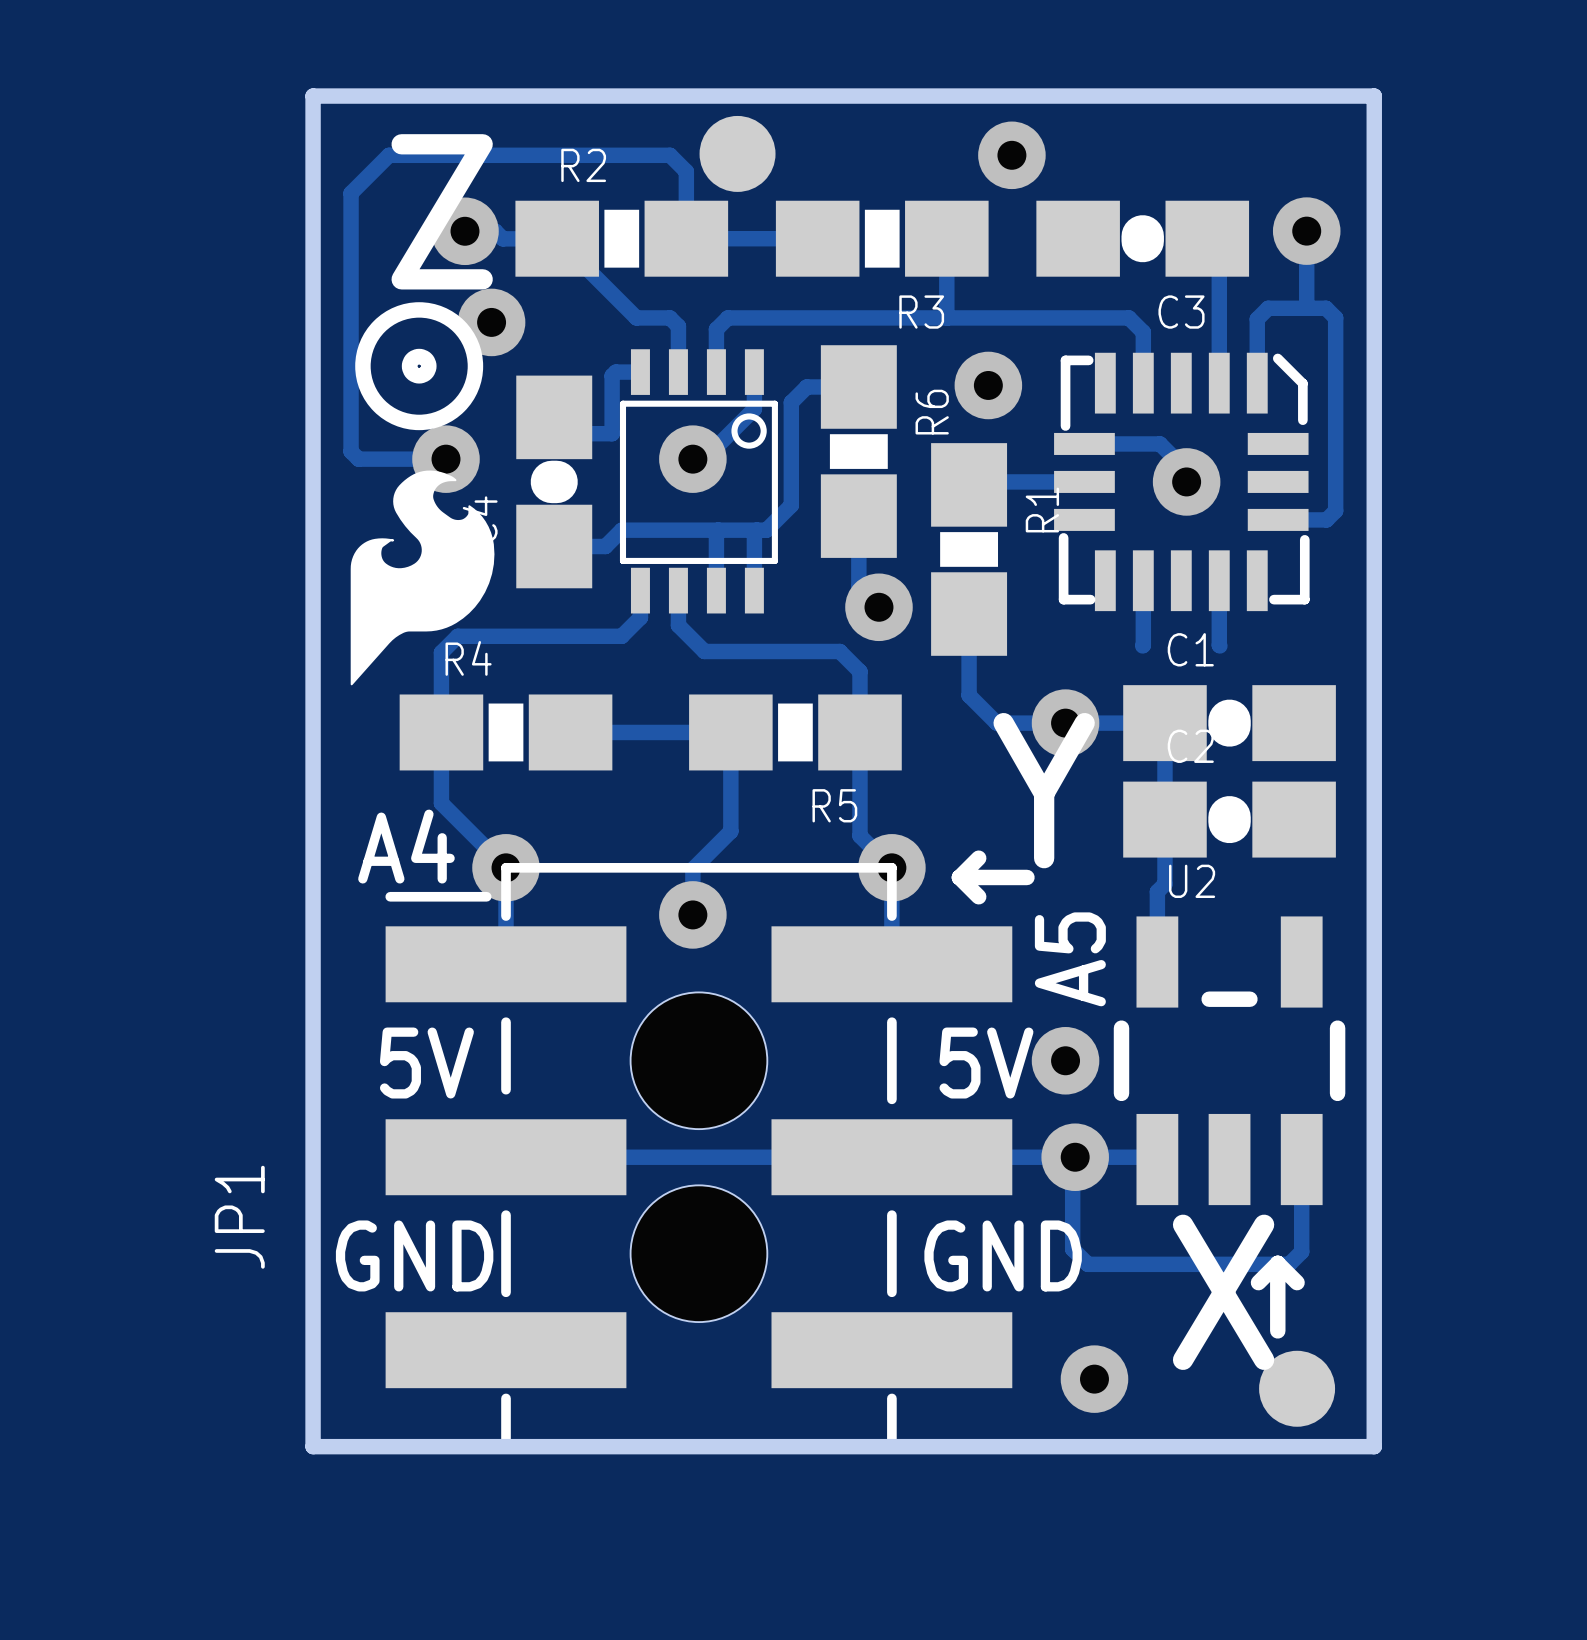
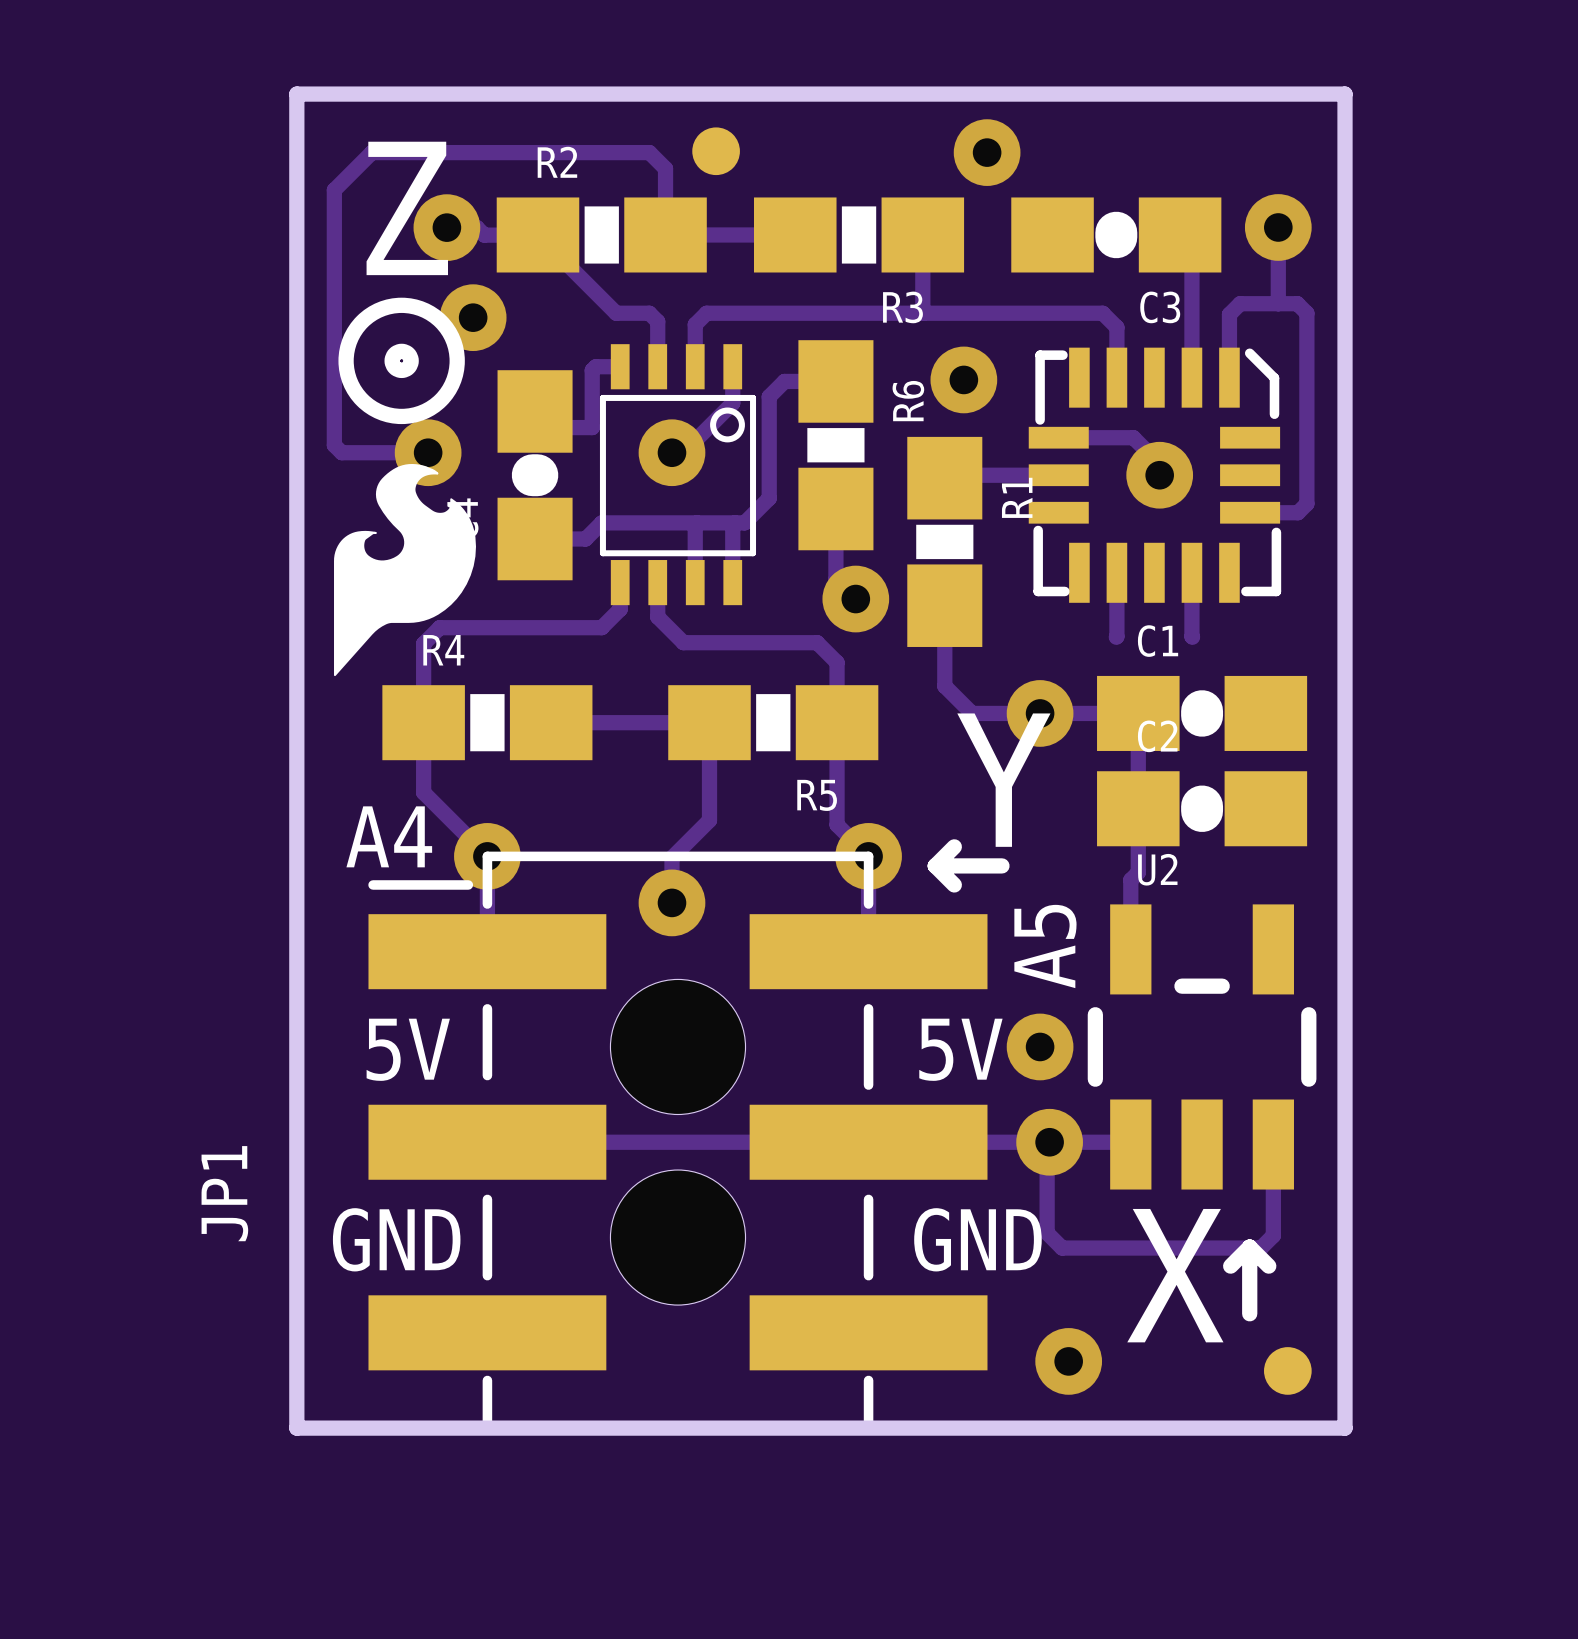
part footprint: [699, 115, 776, 192] -> [692, 127, 740, 176]
part footprint: [1259, 1350, 1336, 1427] -> [1264, 1347, 1312, 1395]

